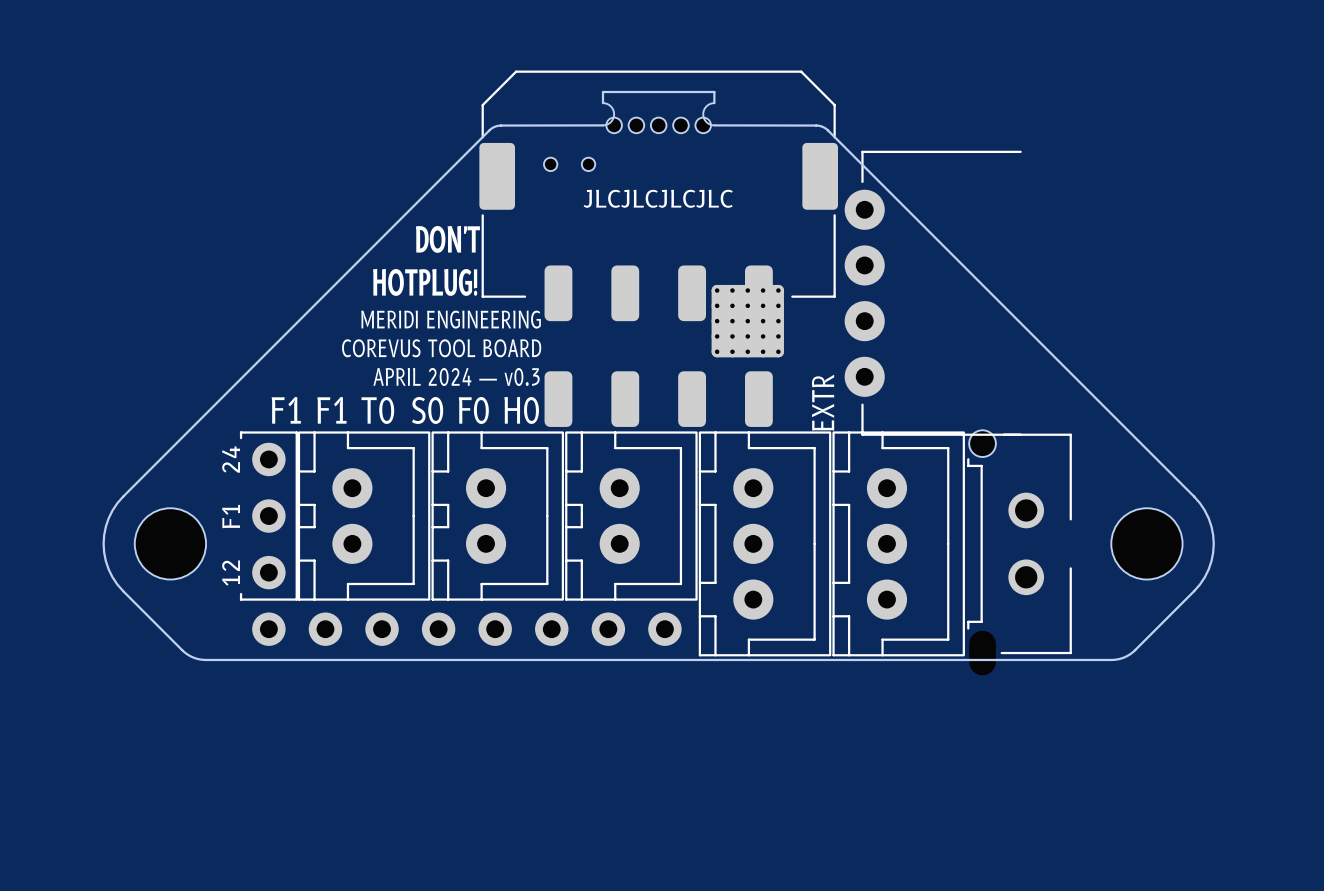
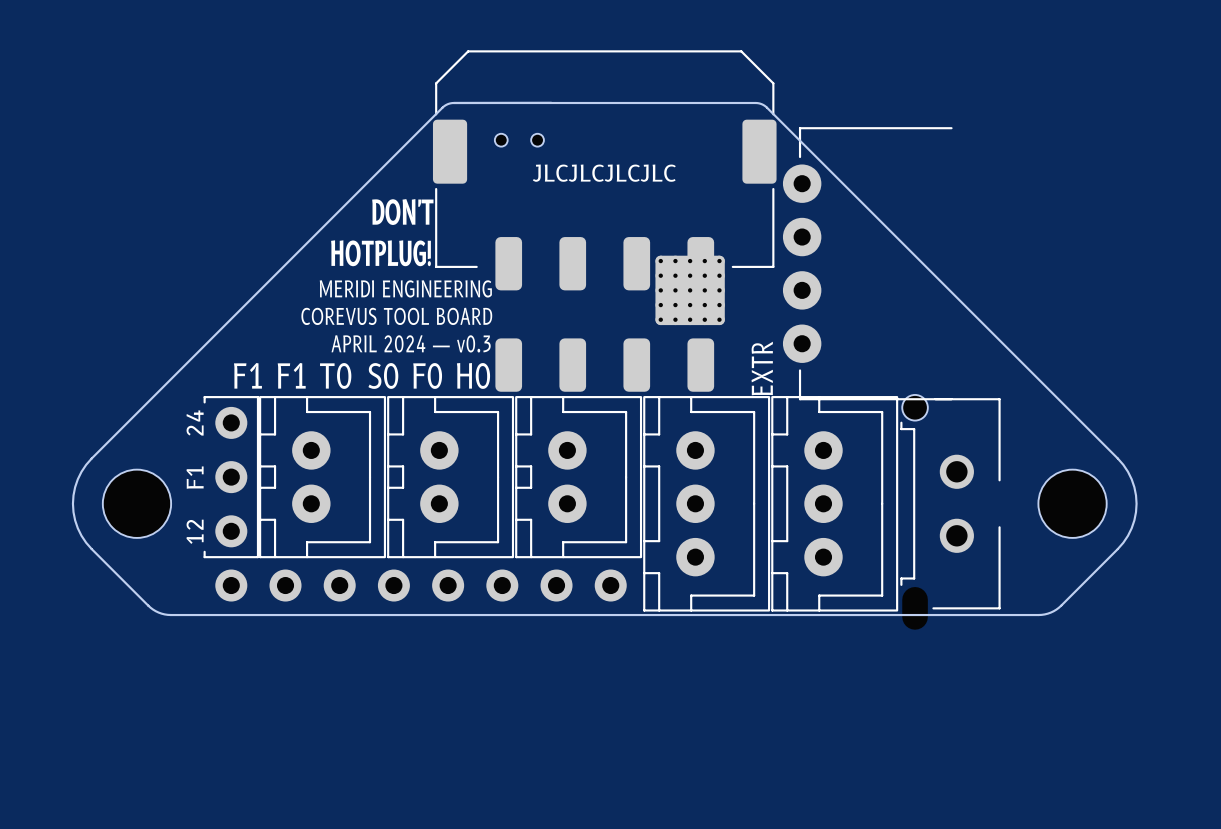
board edge: (602, 103) (602, 91) (714, 91) (714, 103) -> none
part: (658, 117) -> none
board edge: (714, 125) (816, 125) -> (453, 102) (755, 102)

